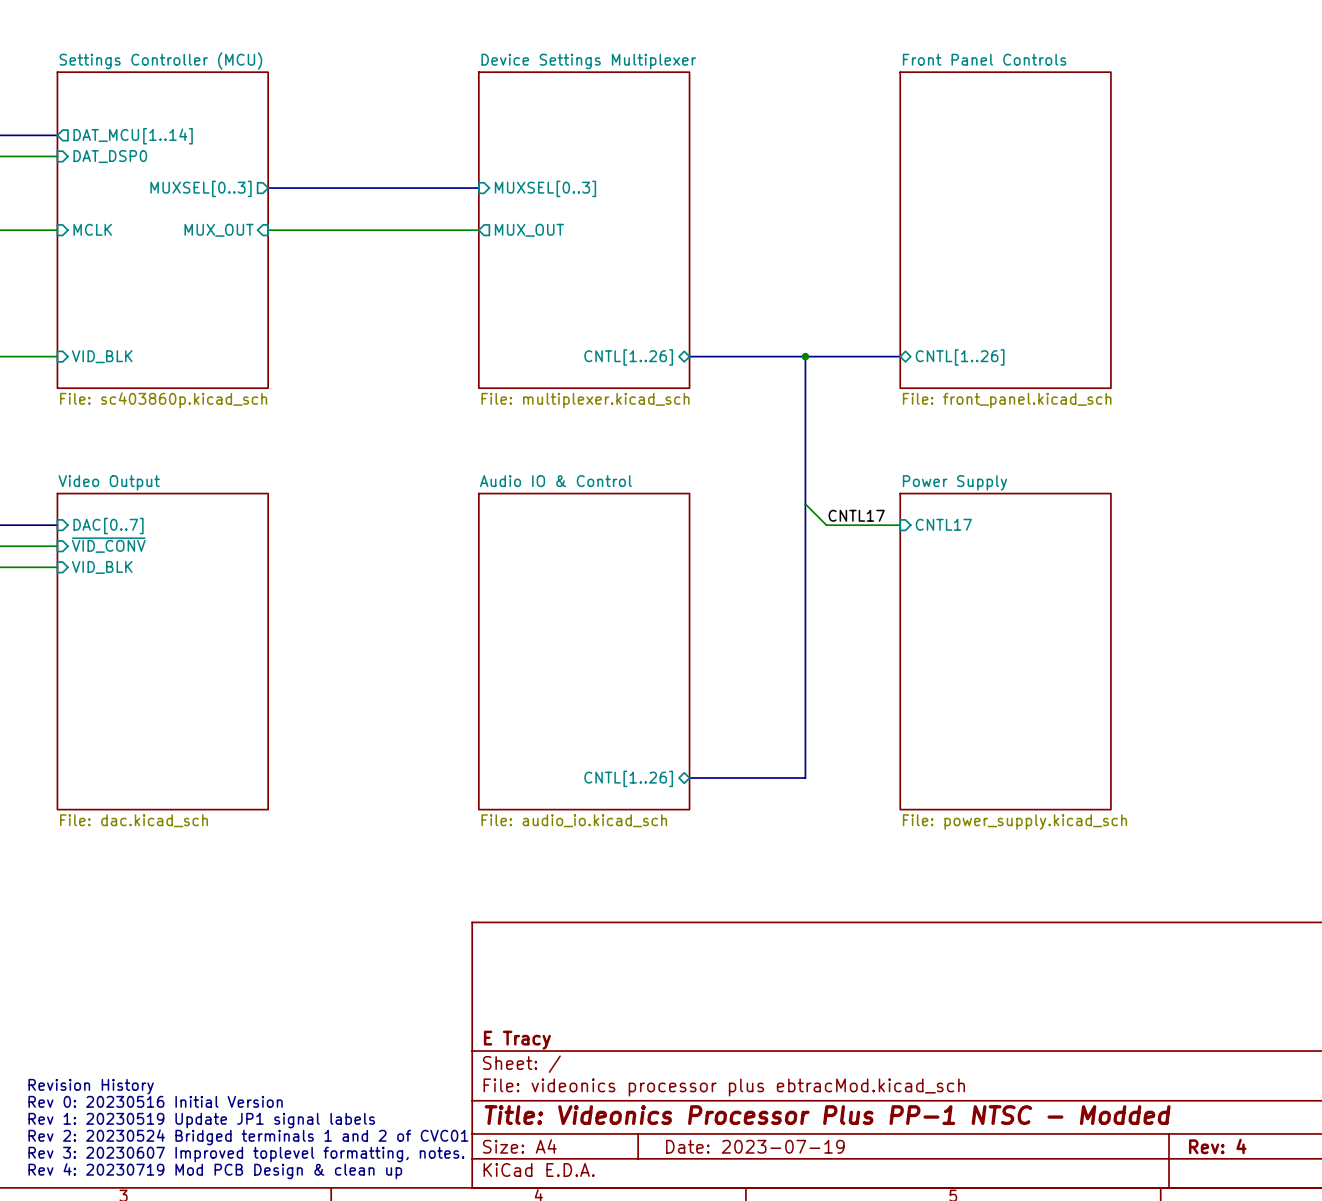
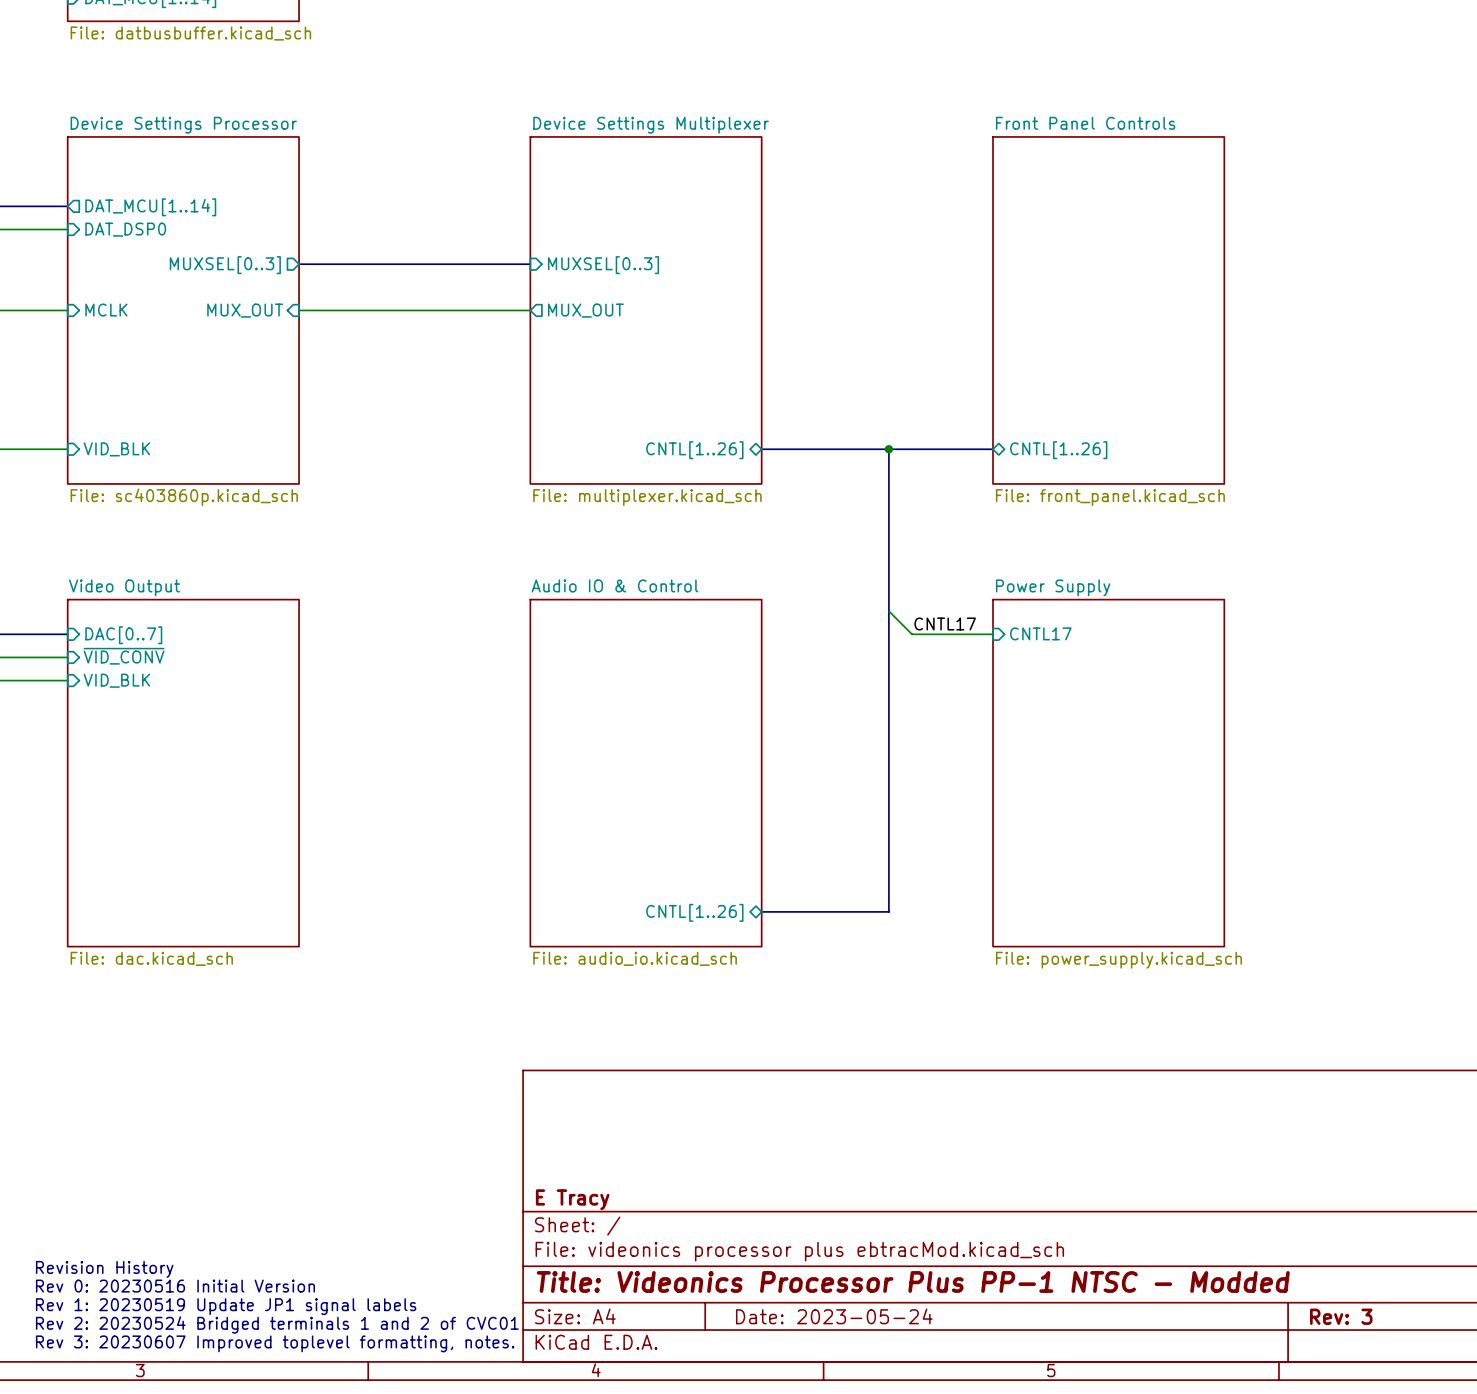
sheet Settings Controller (MCU) name: Settings Controller (MCU) (160, 60) -> Device Settings Processor (183, 125)
text: Revision History (91, 1086) -> none
text: Rev 0: 20230516 Initial Version (155, 1101) -> Revision History (104, 1269)
text: Rev 1: 20230519 Update JP1 signal labels (201, 1120) -> Rev 0: 20230516 Initial Version (175, 1286)
text: Rev 2: 20230524 Bridged terminals 1 and 2 of CVC01 (248, 1137) -> Rev 1: 20230519 Update JP1 signal labels (226, 1306)
title block: Date: 2023-07-19 (755, 1146) -> Date: 2023-05-24 (834, 1316)
title block: Rev: 4 (1217, 1146) -> Rev: 3 (1341, 1316)
text: Rev 3: 20230607 Improved toplevel formatting, notes. (246, 1154) -> Rev 2: 20230524 Bridged terminals 1 and 2 of CVC01 (277, 1324)
text: Rev 4: 20230719 Mod PCB Design & clean up (215, 1171) -> Rev 3: 20230607 Improved toplevel formatting, notes. (275, 1343)

